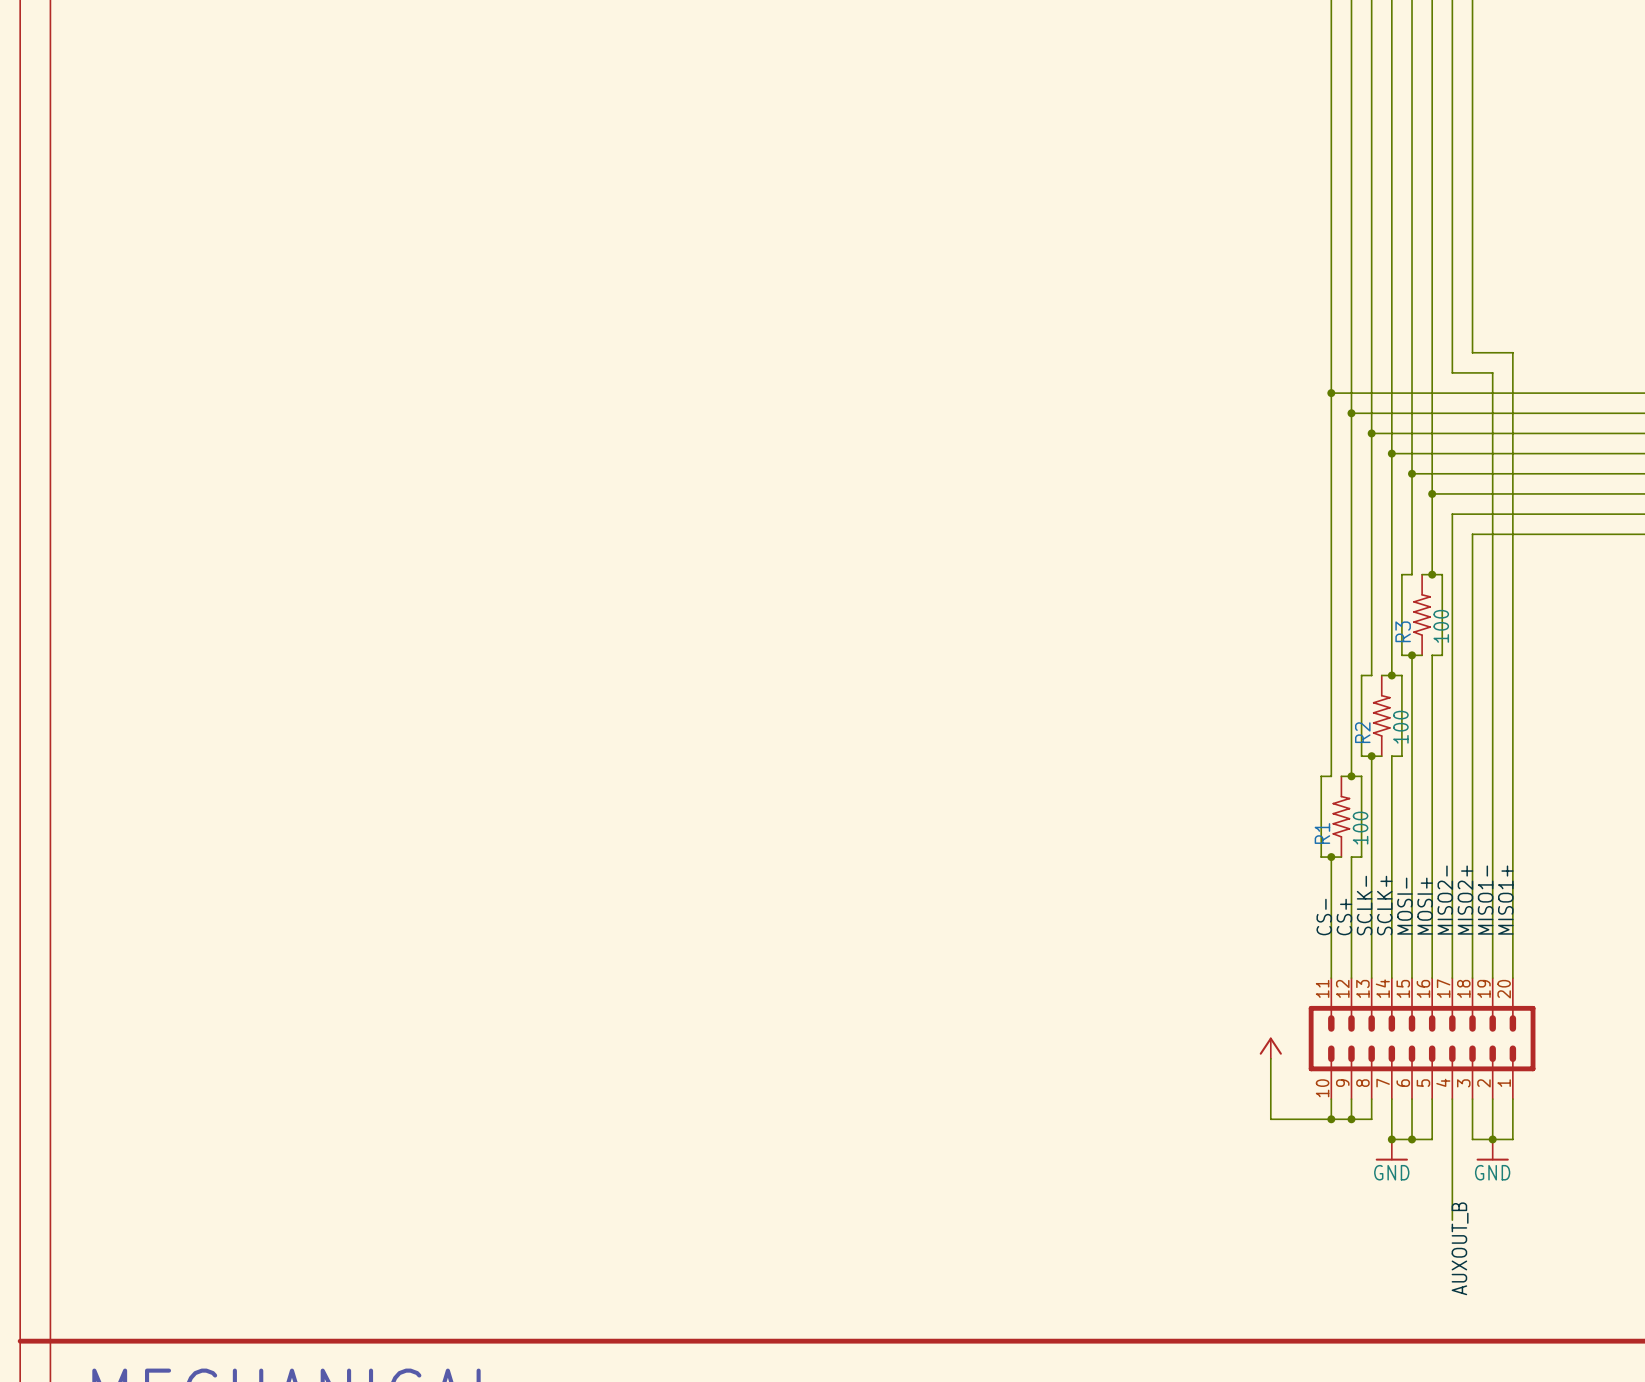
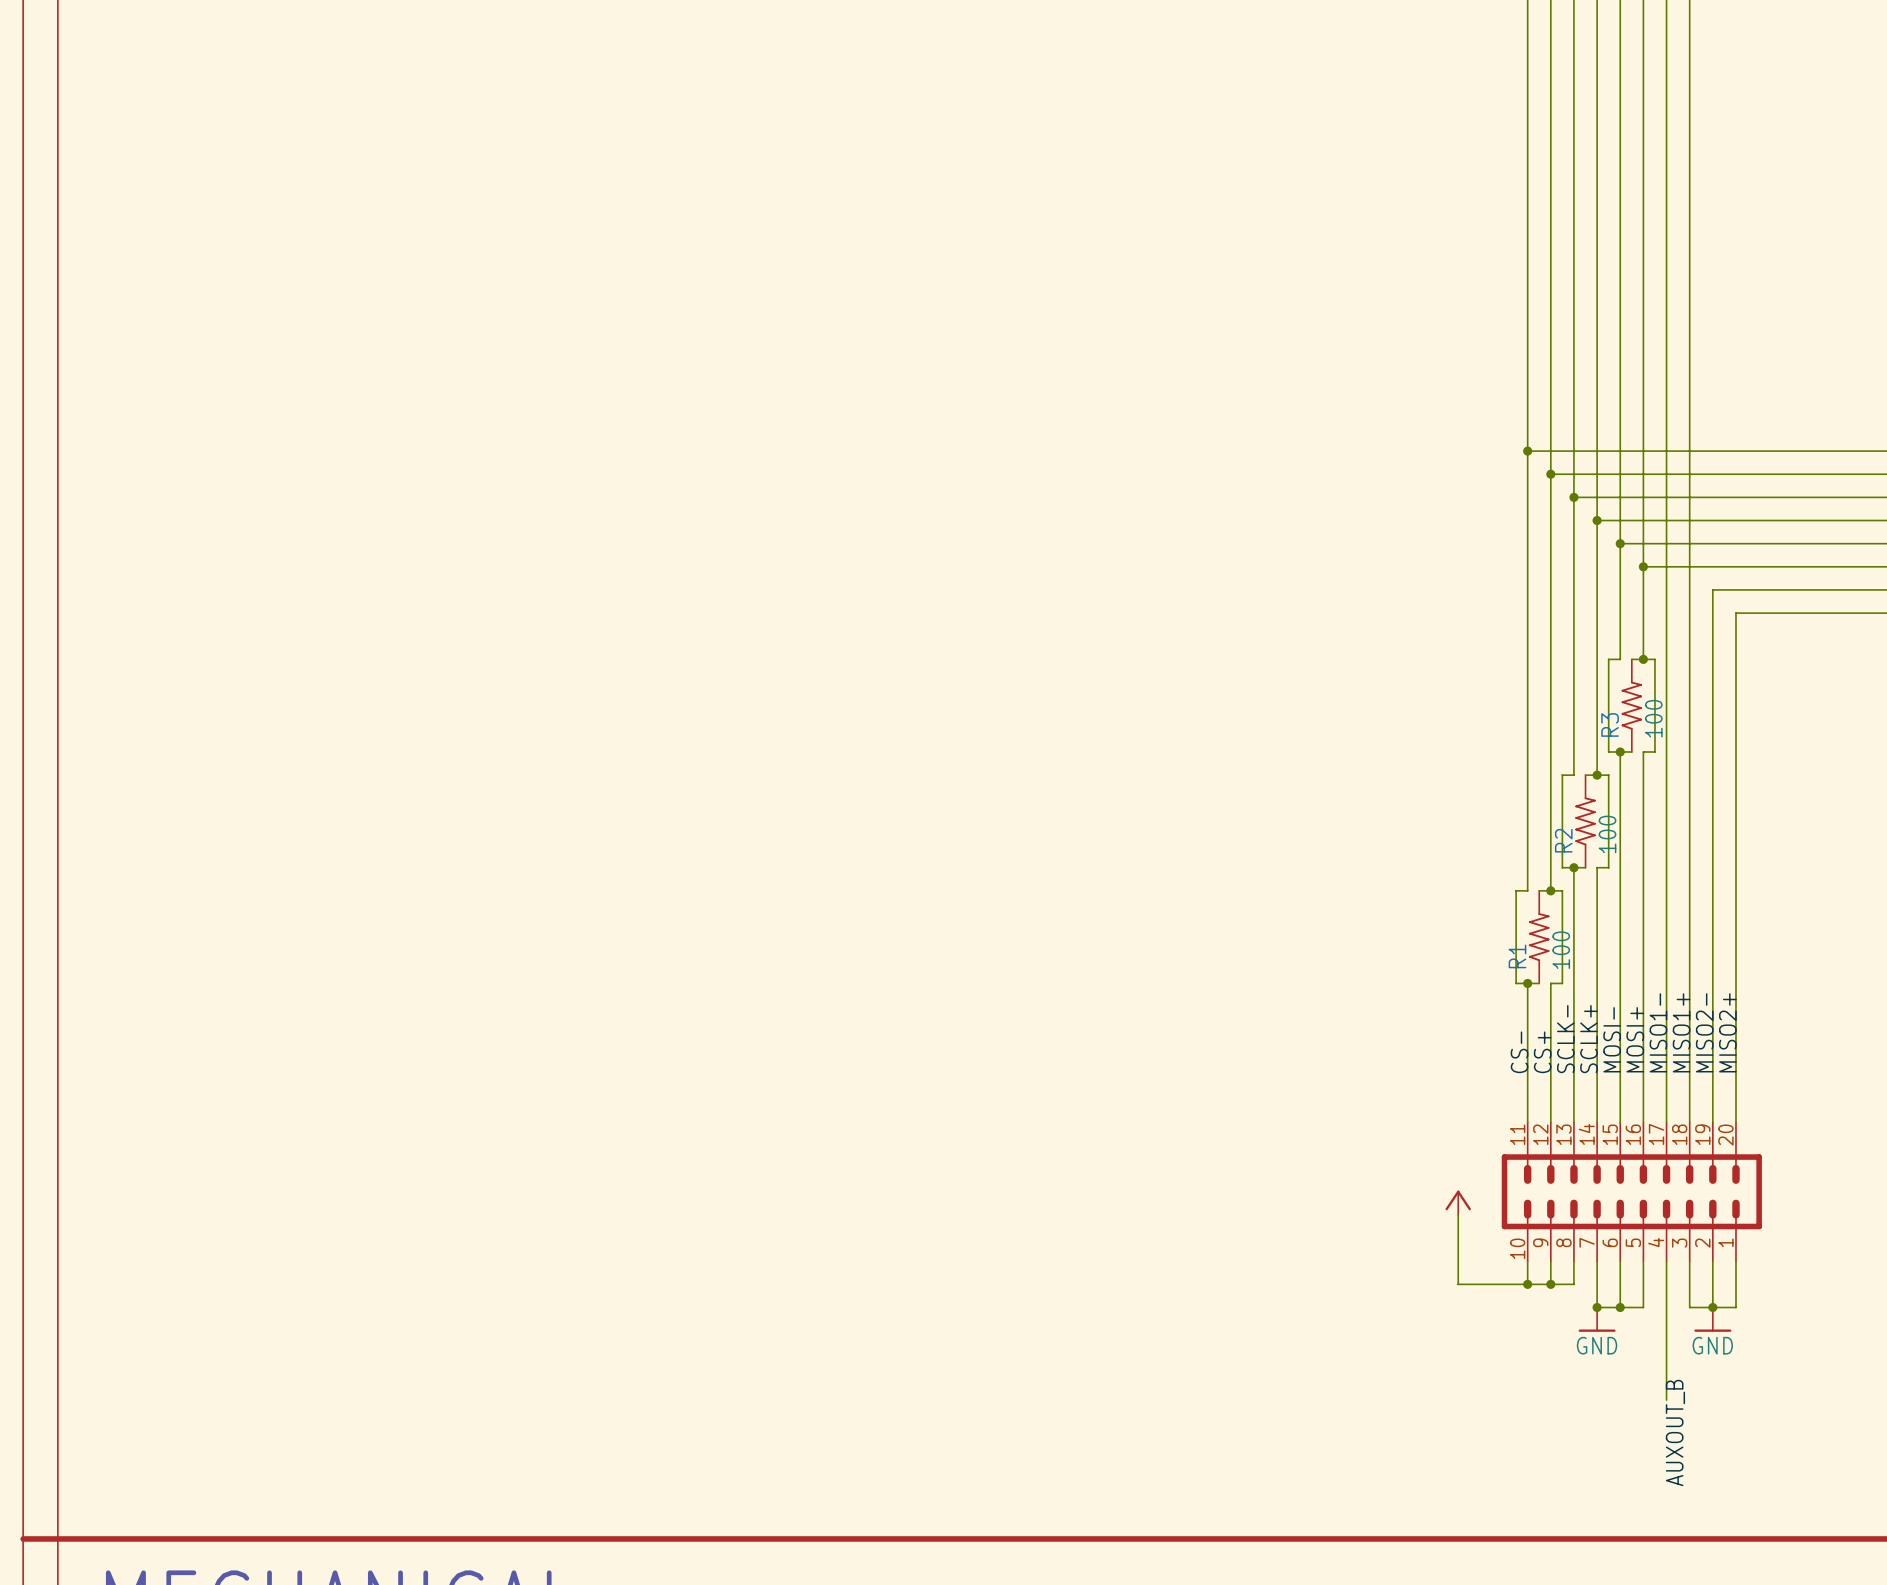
wire: (1472, 352) (1512, 352) (1512, 534) (1472, 534) -> (1689, 404) (1689, 613)
wire: (1452, 372) (1492, 372) (1492, 514) (1452, 514) -> (1666, 427) (1666, 589)
label: MISO2- (1445, 900) -> MISO1- (1658, 1032)
label: MISO2+ (1465, 900) -> MISO1+ (1681, 1032)
label: MISO1- (1485, 900) -> MISO2- (1704, 1032)
label: MISO1+ (1505, 900) -> MISO2+ (1727, 1032)

